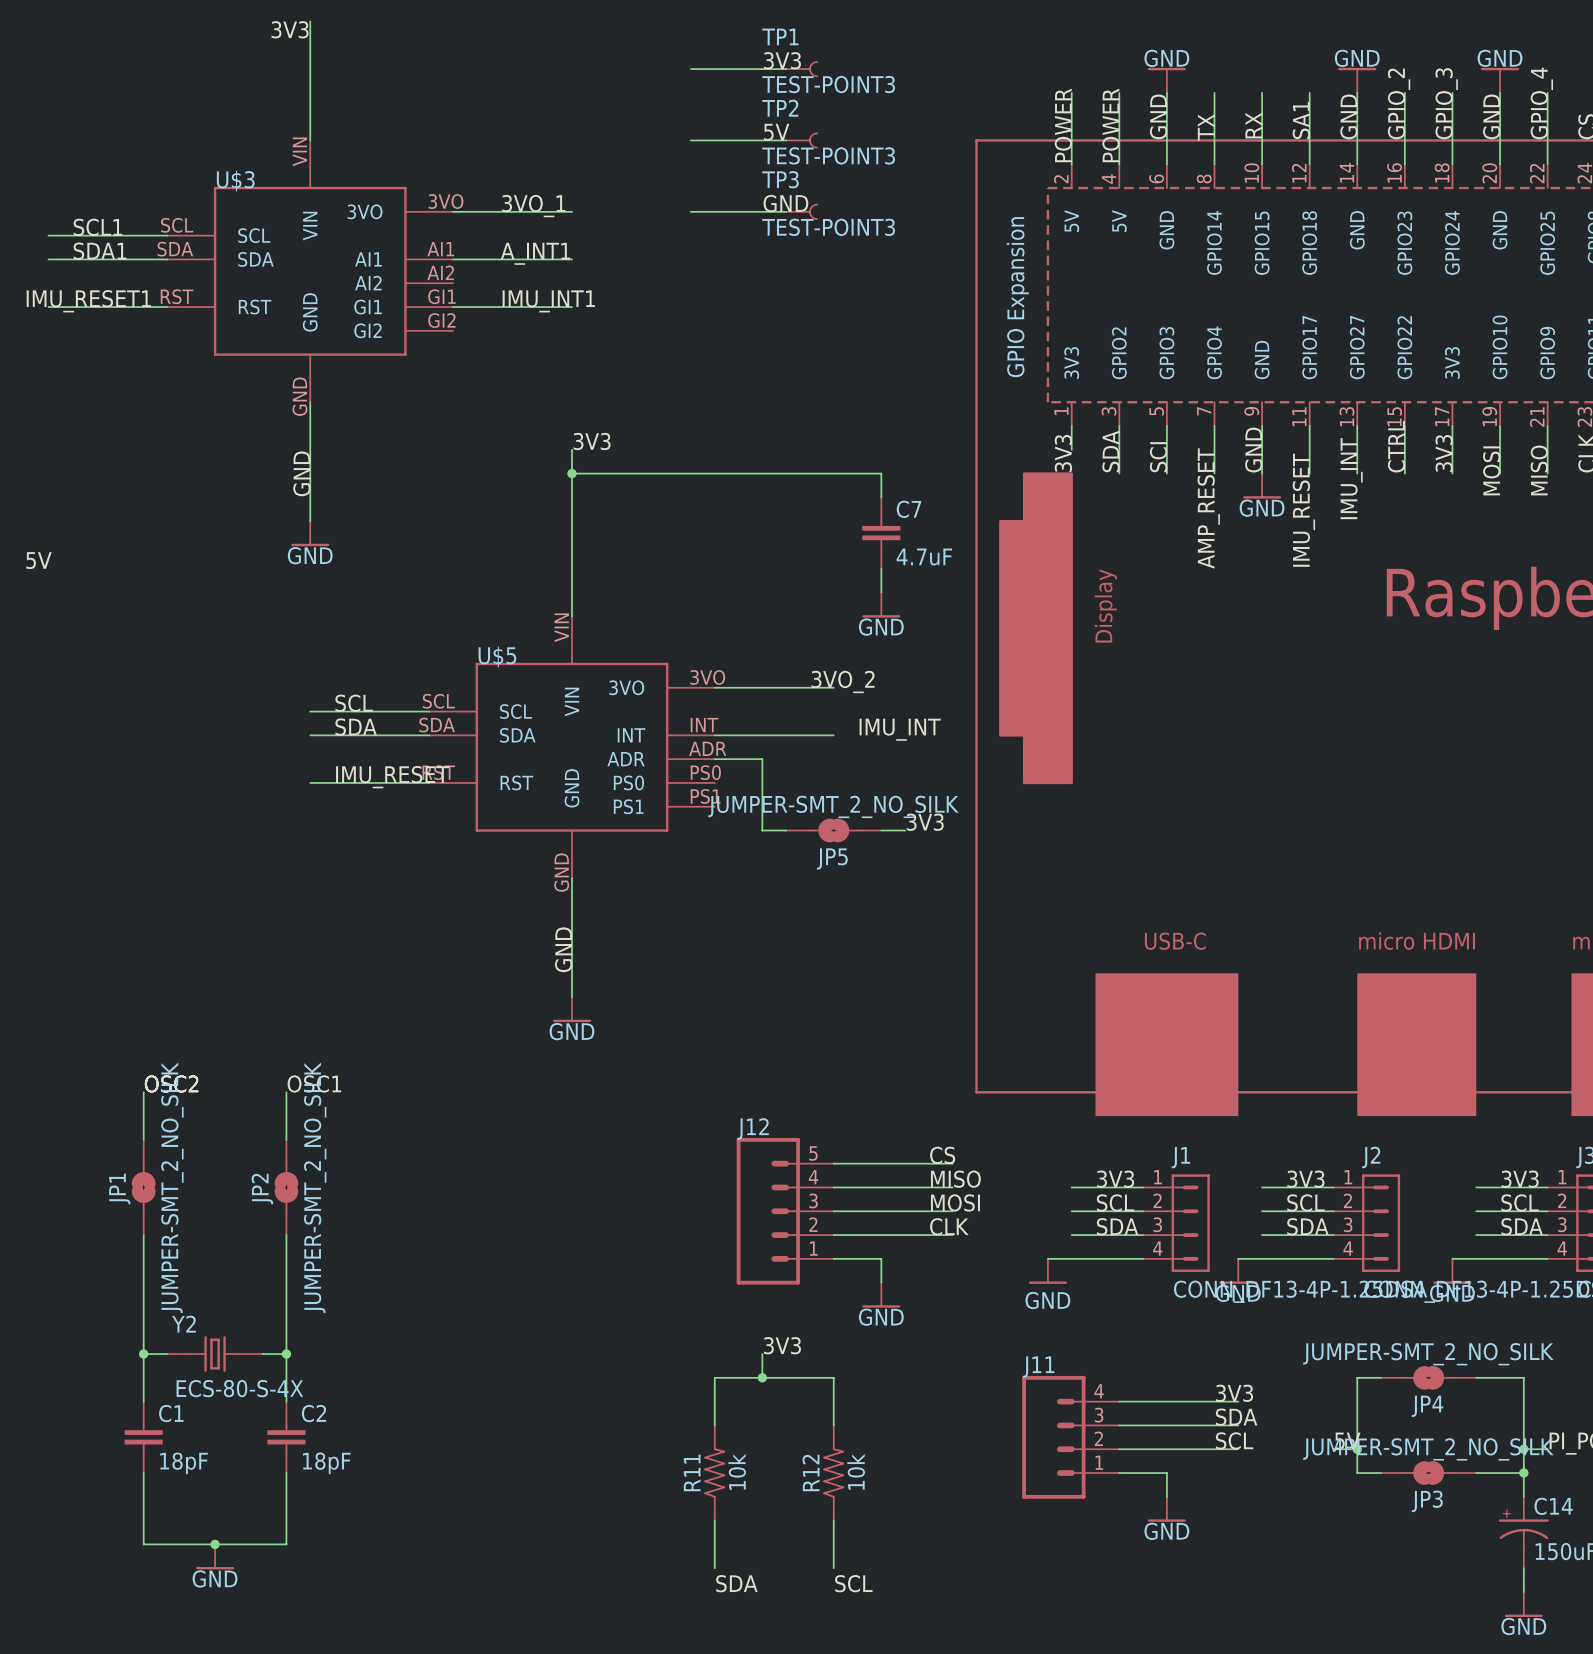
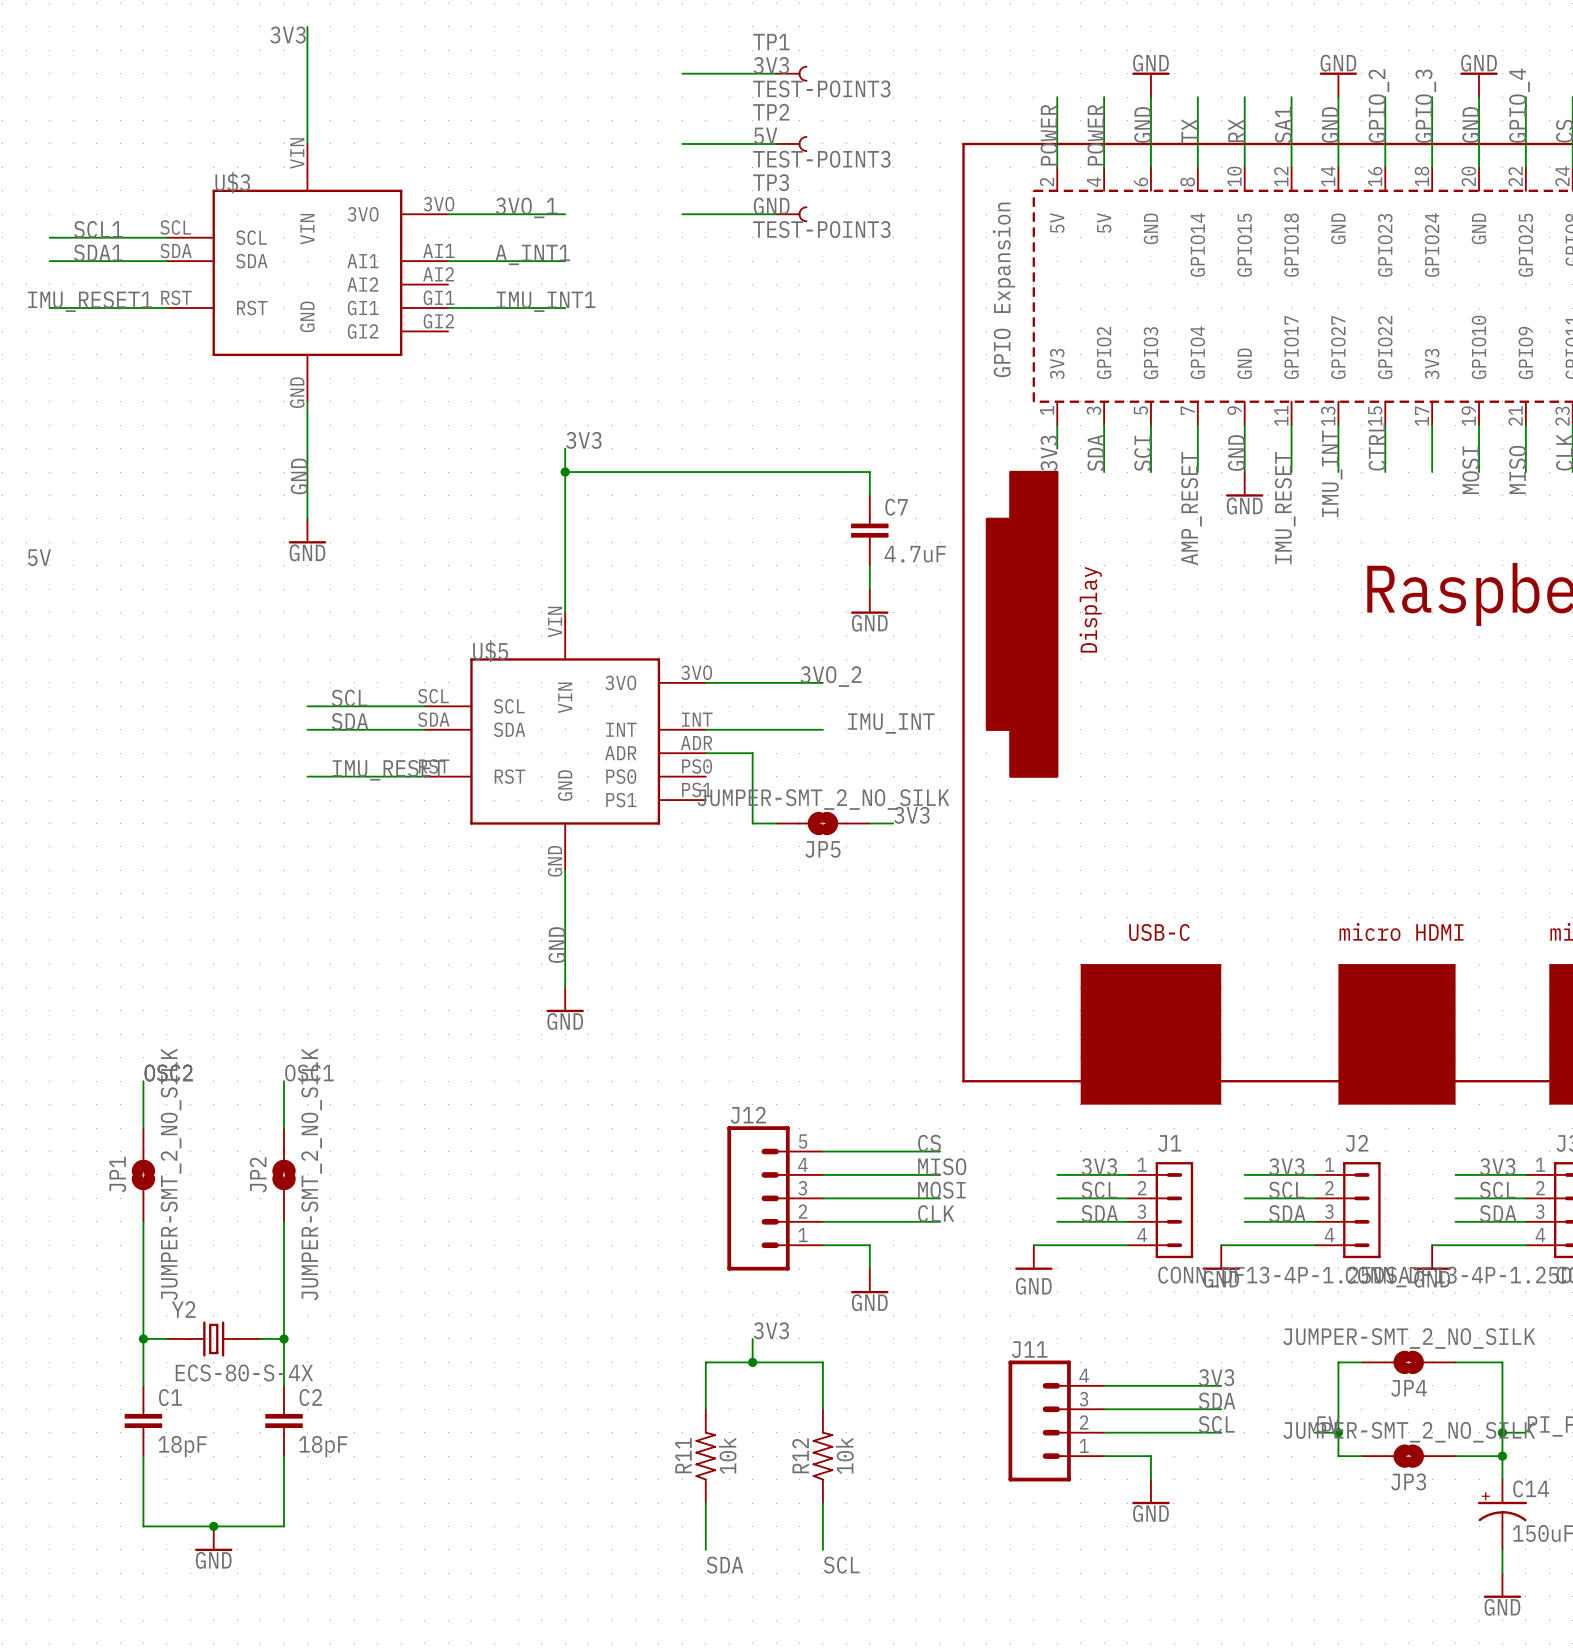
label: 3V3 (1444, 453) -> none

